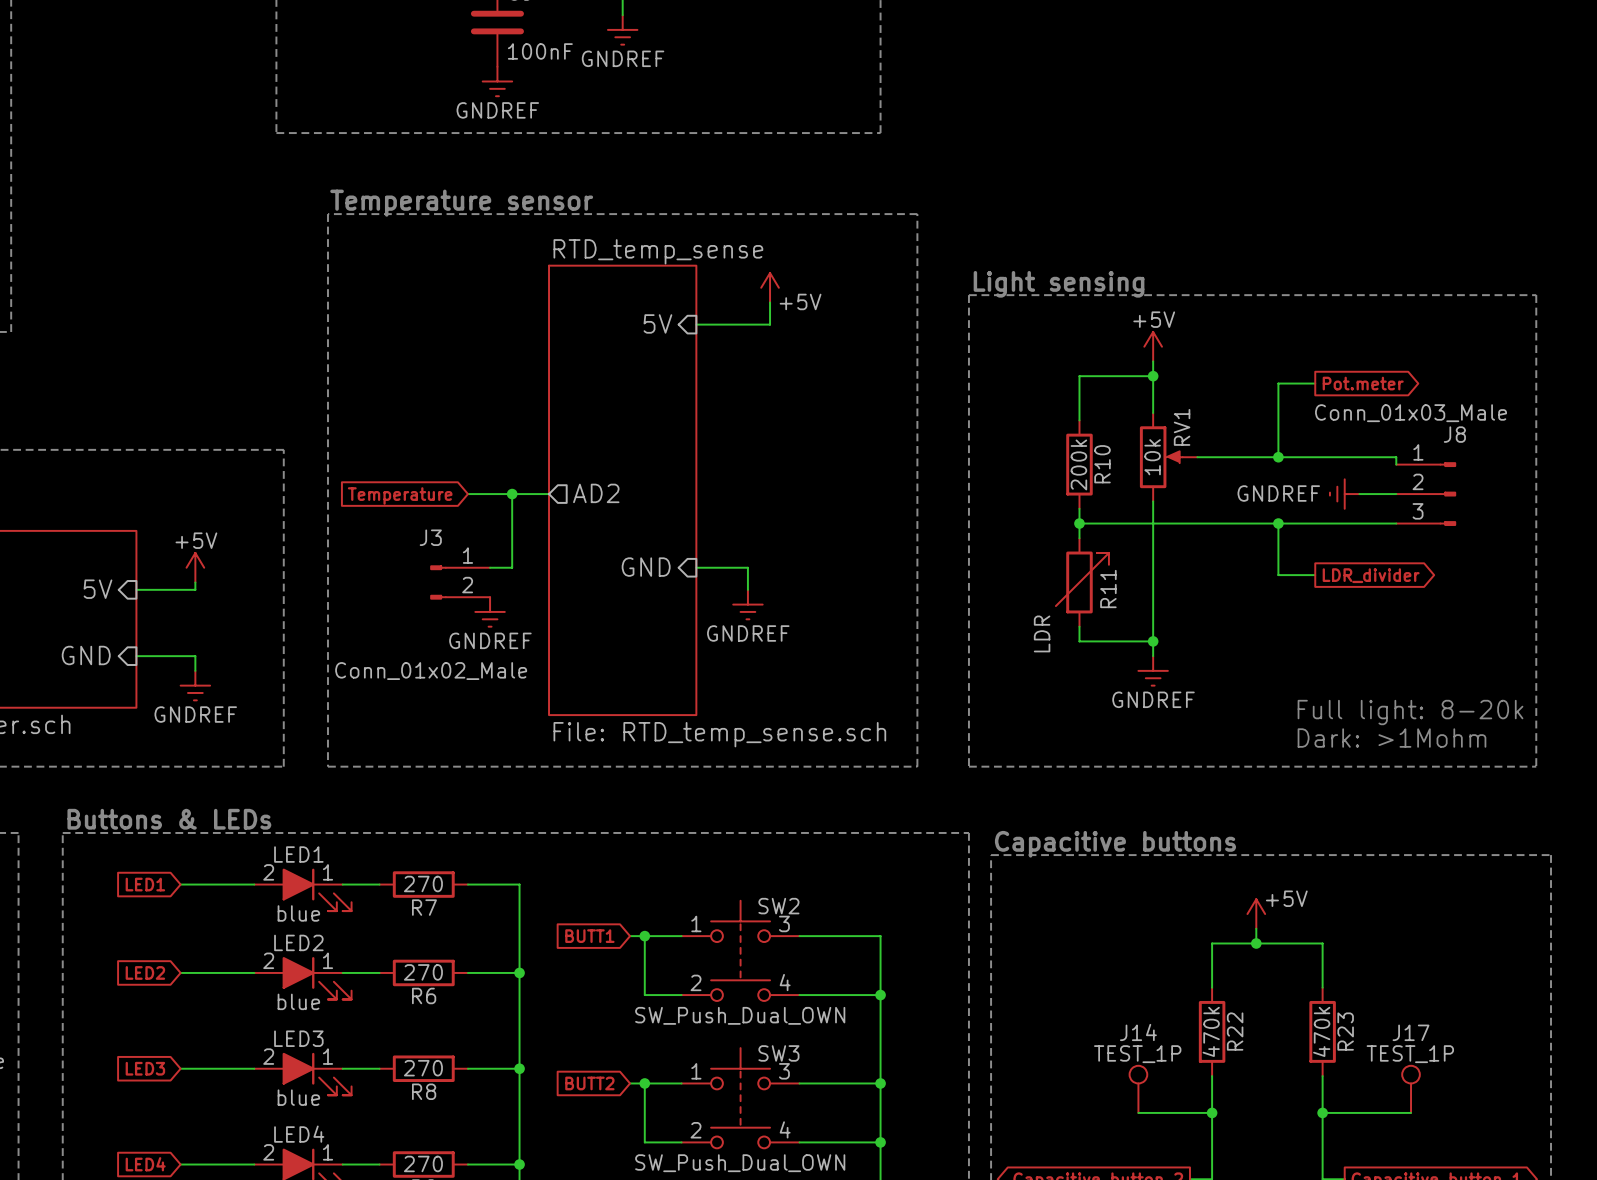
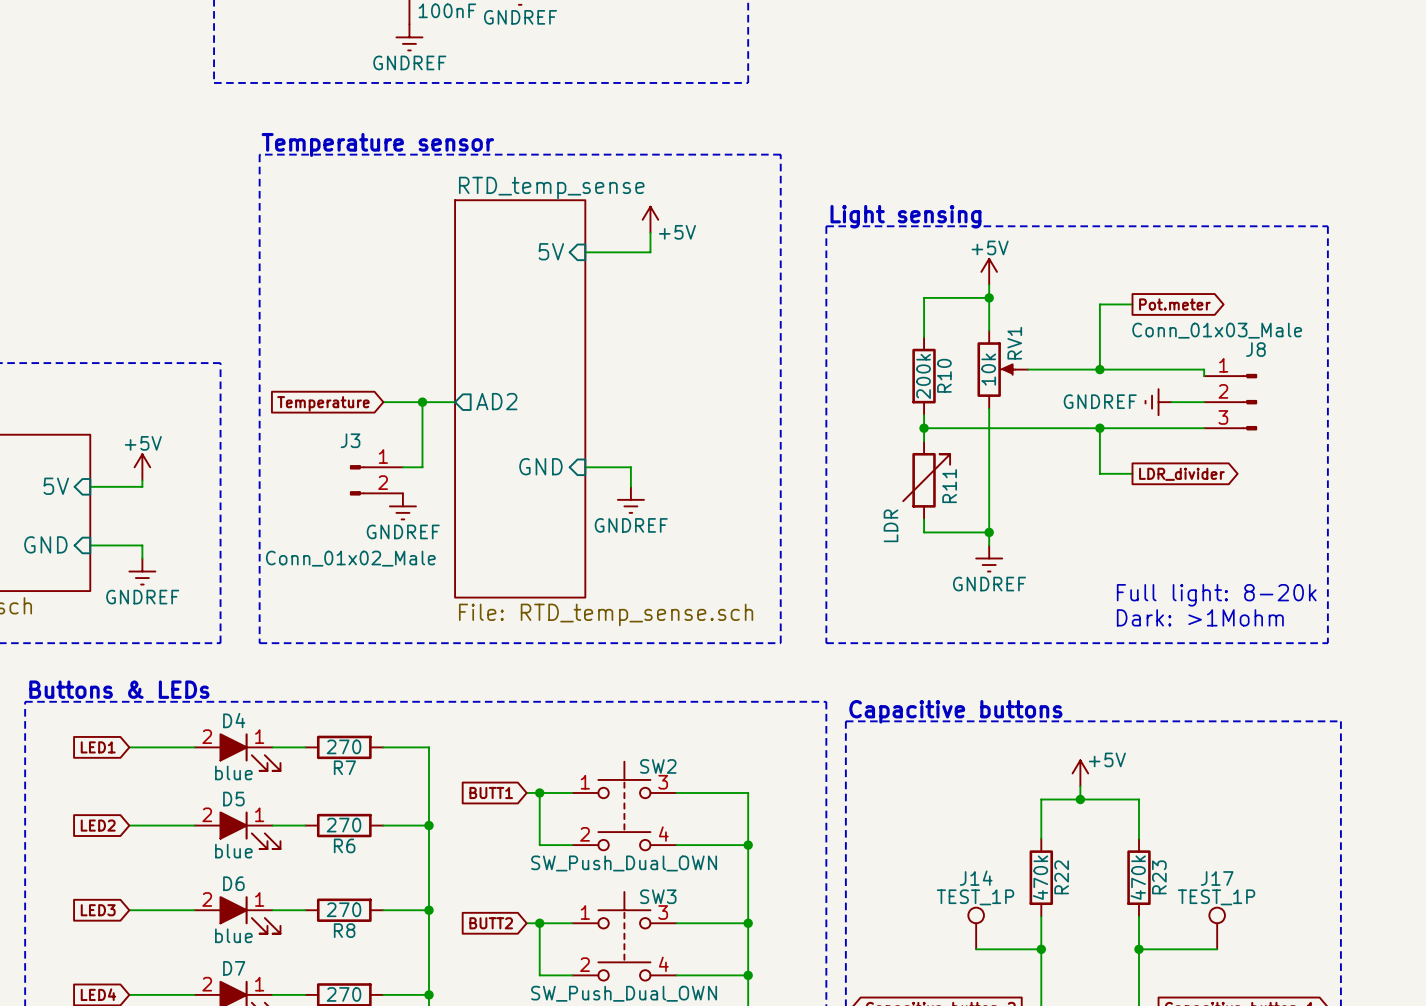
LED1 name: LED1 (298, 854) -> D4 (234, 720)
LED2 name: LED2 (298, 942) -> D5 (233, 799)
LED3 name: LED3 (298, 1038) -> D6 (233, 883)
LED4 name: LED4 (299, 1134) -> D7 (234, 968)

